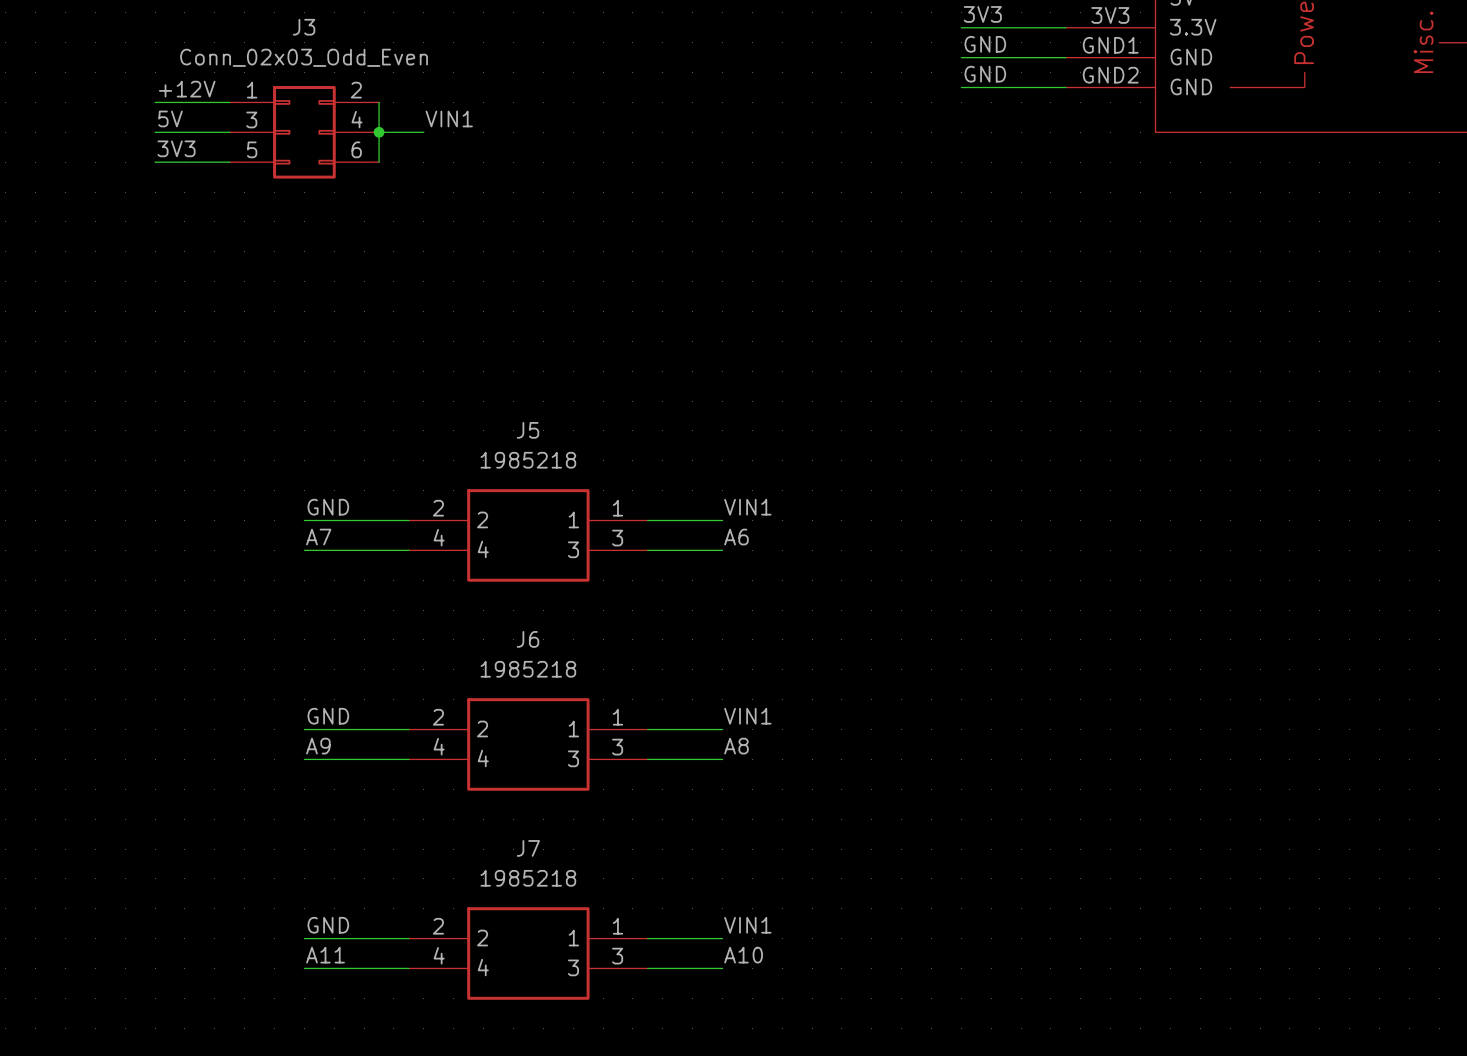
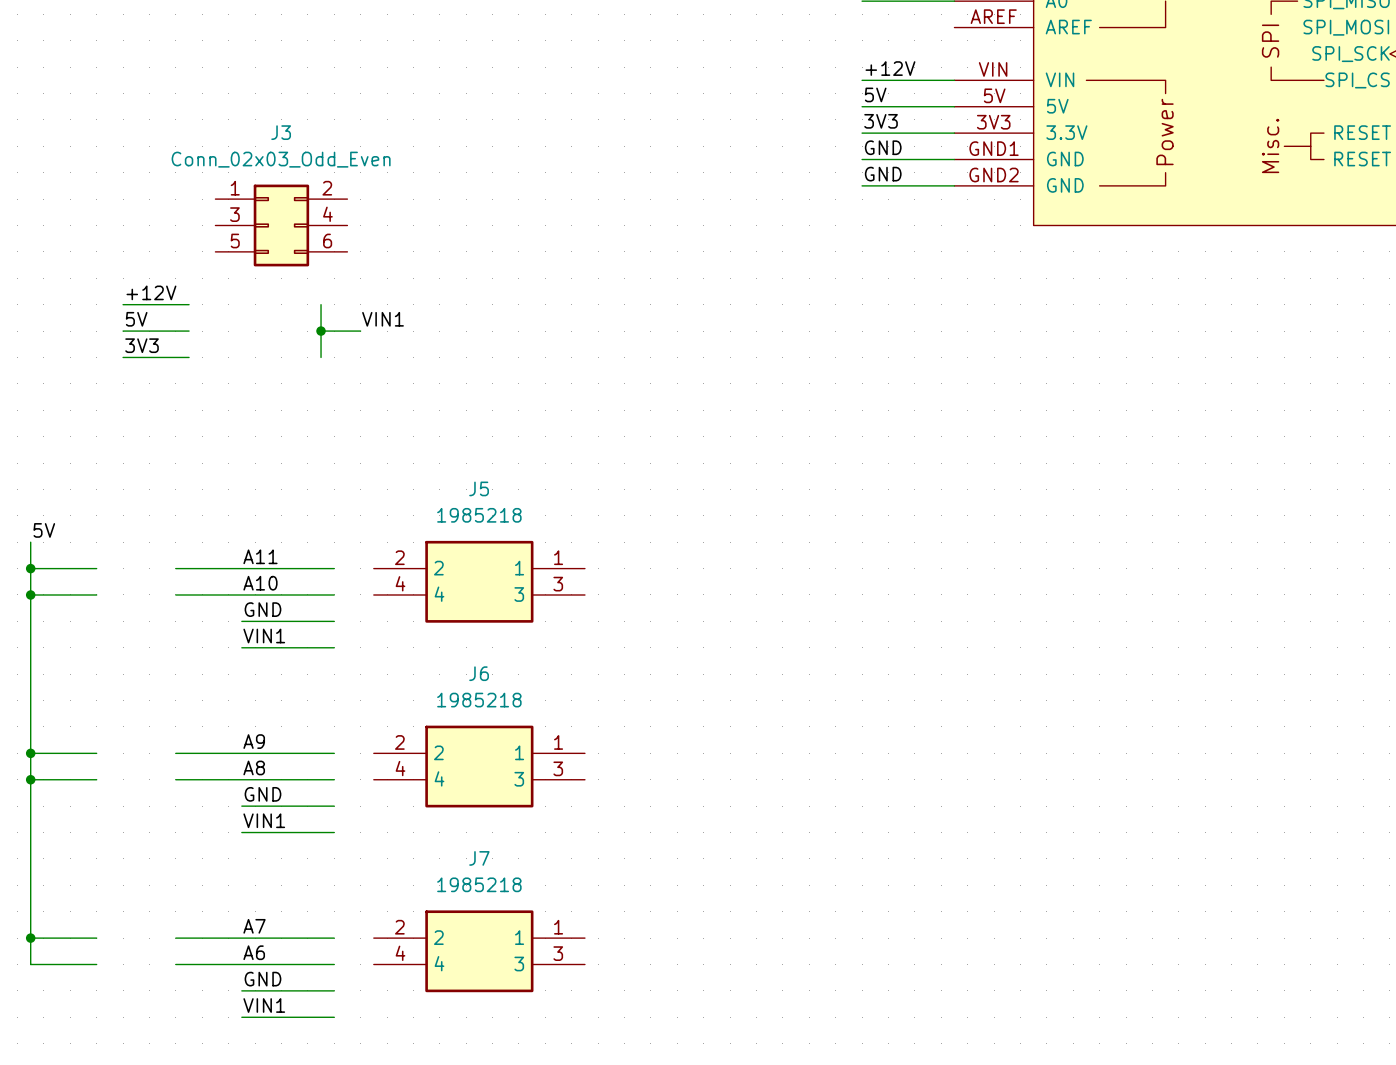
label position: +12V (187, 89) -> +12V (151, 292)
wire: (155, 102) (229, 102) -> (123, 304) (189, 304)
wire: (379, 102) (379, 162) -> (321, 304) (321, 357)
label position: 5V (170, 118) -> 5V (136, 319)
label position: VIN1 (449, 118) -> VIN1 (383, 319)
wire: (155, 132) (229, 132) -> (123, 331) (189, 331)
wire: (379, 132) (423, 132) -> (321, 331) (360, 331)
junction: (379, 132) -> none
label position: 3V3 (176, 148) -> 3V3 (142, 345)
wire: (155, 162) (229, 162) -> (123, 357) (189, 357)
junction: none -> (321, 331)
label: none -> 5V (44, 530)
wire: none -> (30, 542) (30, 964) (96, 964)
label: none -> A11 (260, 556)
label position: GND (328, 507) -> GND (262, 609)
label: VIN1 (747, 507) -> none
wire: none -> (30, 568) (96, 568)
junction: none -> (30, 568)
wire: none -> (175, 568) (281, 568)
wire: (364, 520) (408, 520) -> none
wire: (647, 520) (722, 520) -> none
label: none -> A10 (260, 583)
label: A7 (318, 537) -> none
label: A6 (736, 537) -> none
wire: none -> (30, 594) (96, 594)
junction: none -> (30, 594)
wire: none -> (175, 594) (281, 594)
wire: (364, 550) (408, 550) -> none
wire: (647, 550) (722, 550) -> none
wire: none -> (241, 621) (334, 621)
label: none -> VIN1 (264, 636)
wire: none -> (241, 647) (334, 647)
label position: GND (328, 716) -> GND (262, 794)
label: VIN1 (747, 716) -> none
wire: none -> (30, 753) (96, 753)
junction: none -> (30, 753)
wire: none -> (175, 753) (281, 753)
wire: (364, 729) (408, 729) -> none
wire: (647, 729) (722, 729) -> none
label: none -> A8 (254, 767)
label position: A9 (318, 746) -> A9 (254, 741)
label: A8 (736, 746) -> none
wire: none -> (30, 779) (96, 779)
junction: none -> (30, 779)
wire: none -> (175, 779) (281, 779)
wire: (364, 759) (408, 759) -> none
wire: (647, 759) (722, 759) -> none
wire: none -> (241, 806) (334, 806)
label: none -> VIN1 (264, 820)
wire: none -> (241, 832) (334, 832)
label: none -> A7 (254, 926)
label position: GND (328, 925) -> GND (262, 979)
label: VIN1 (747, 925) -> none
wire: none -> (30, 938) (96, 938)
junction: none -> (30, 938)
wire: none -> (175, 938) (281, 938)
wire: (364, 938) (408, 938) -> none
wire: (647, 938) (722, 938) -> none
label: none -> A6 (254, 952)
label: A11 (325, 955) -> none
label: A10 (743, 955) -> none
wire: none -> (175, 964) (281, 964)
wire: (364, 968) (408, 968) -> none
wire: (647, 968) (722, 968) -> none
wire: none -> (241, 990) (334, 990)
label: none -> VIN1 (264, 1005)
wire: none -> (241, 1017) (334, 1017)

